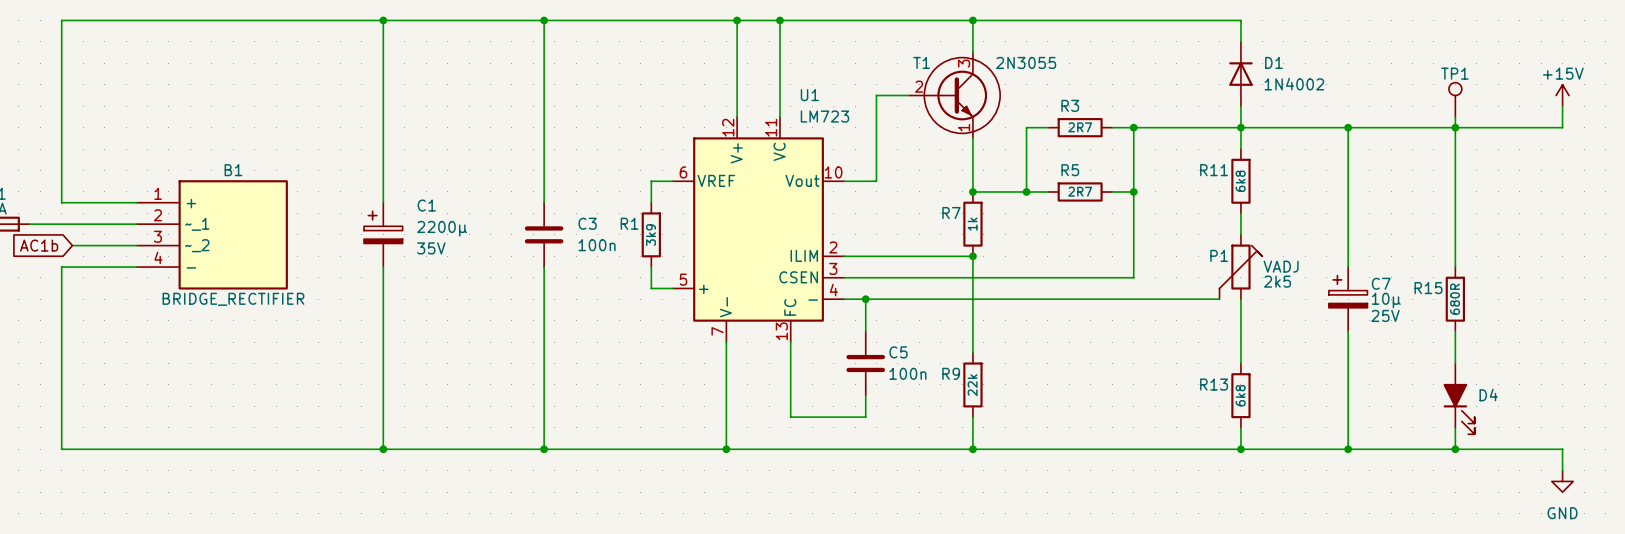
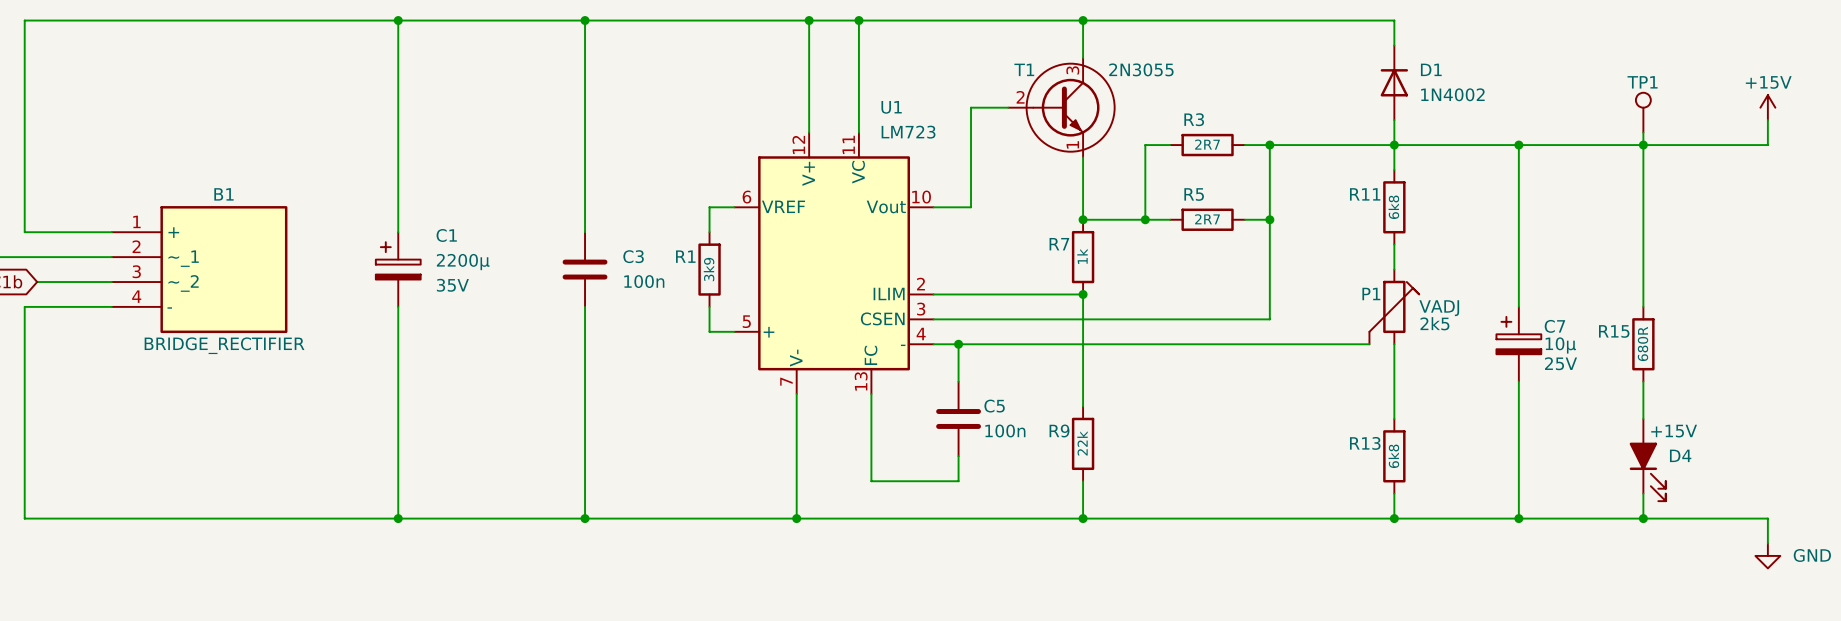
D4 text: none -> +15V (1674, 431)
power symbol text position: GND (1562, 513) -> GND (1812, 555)

